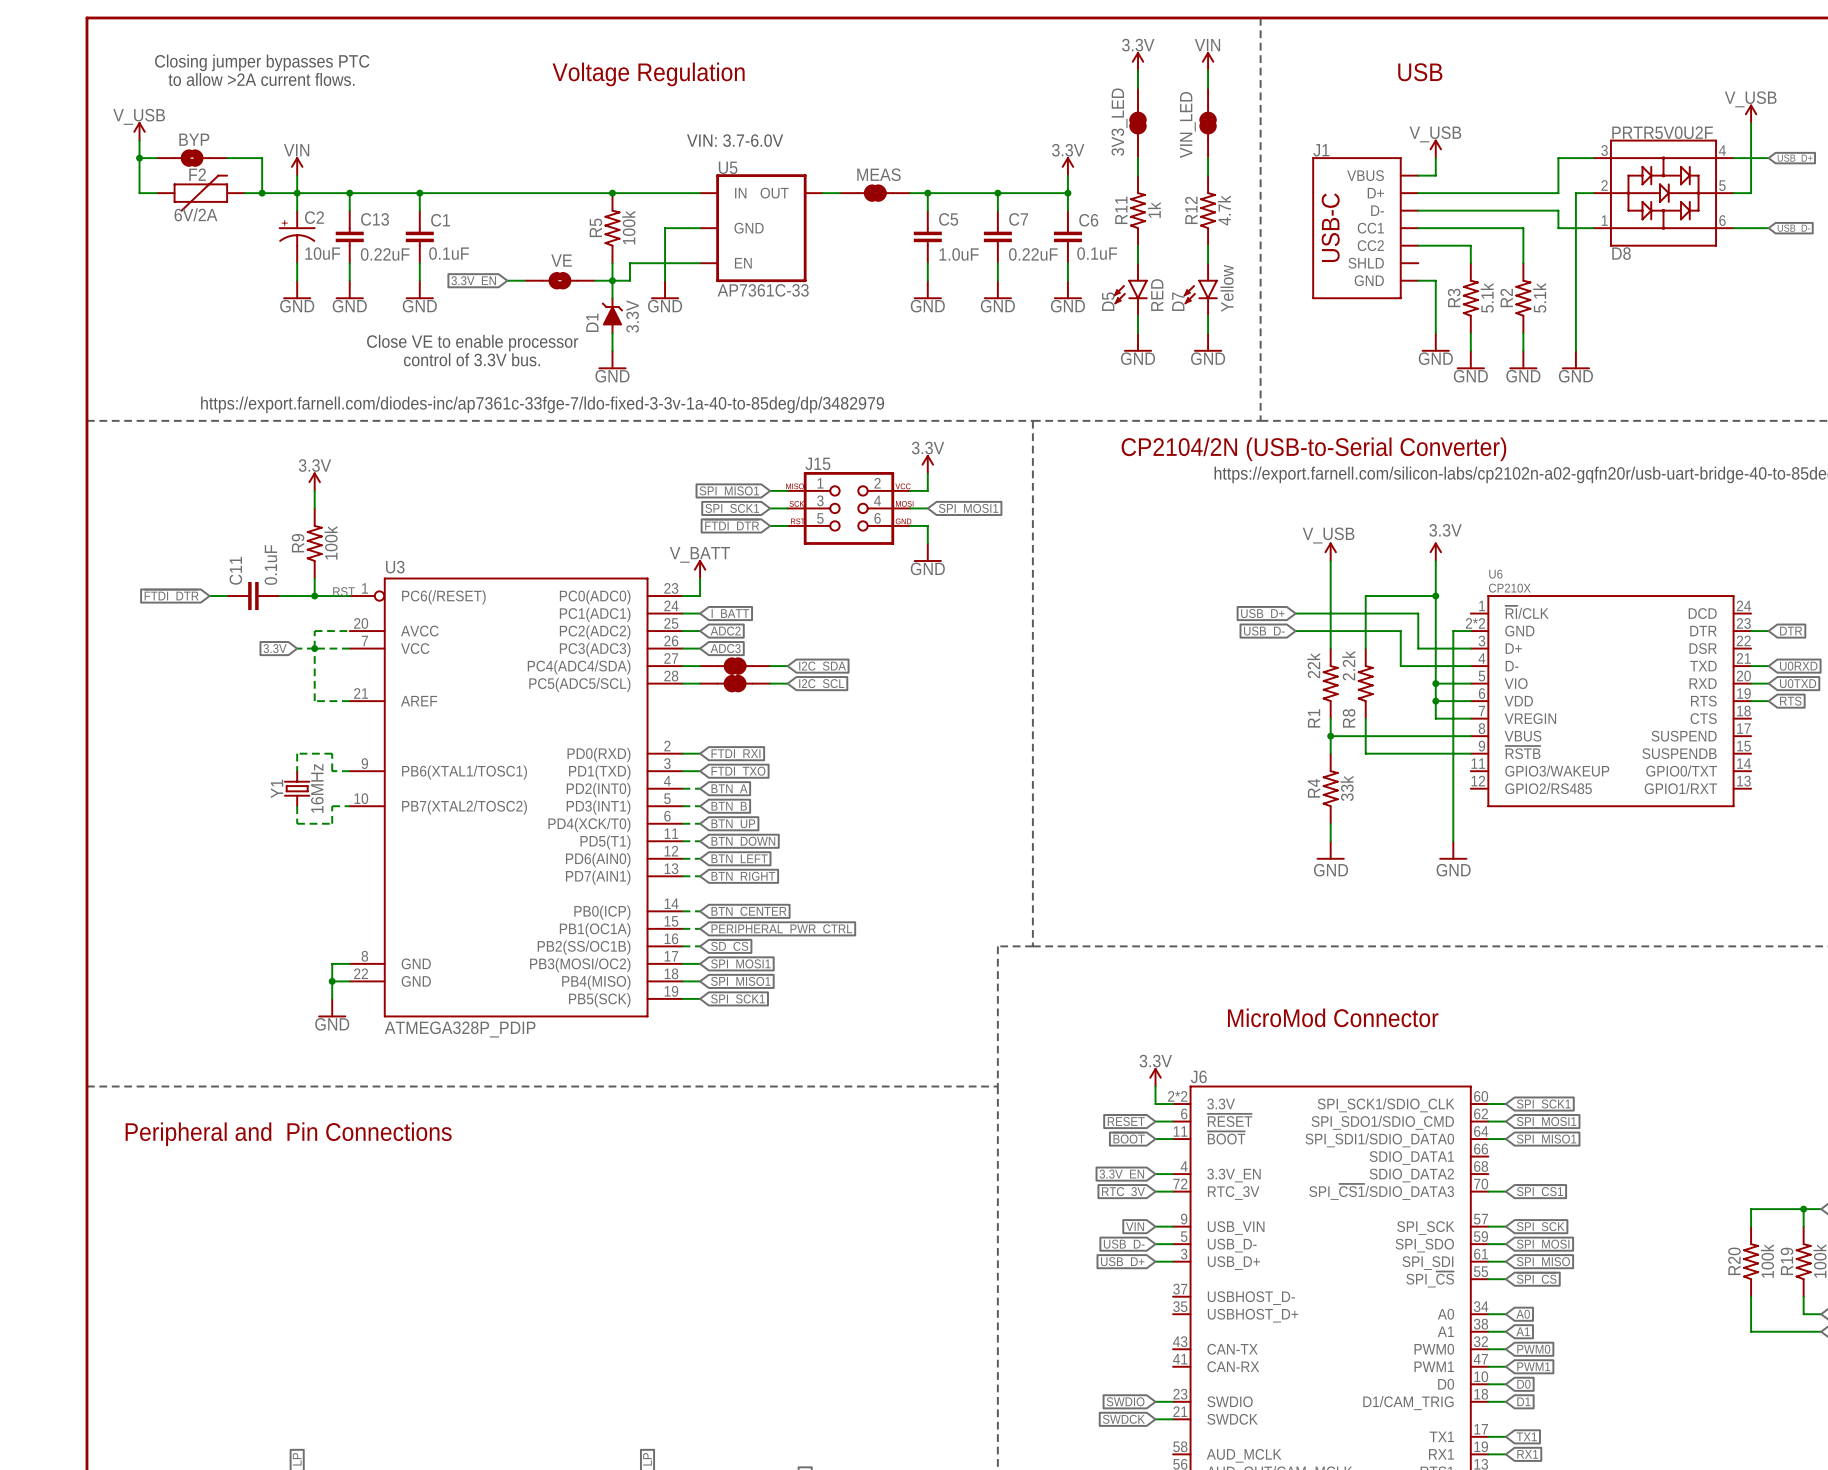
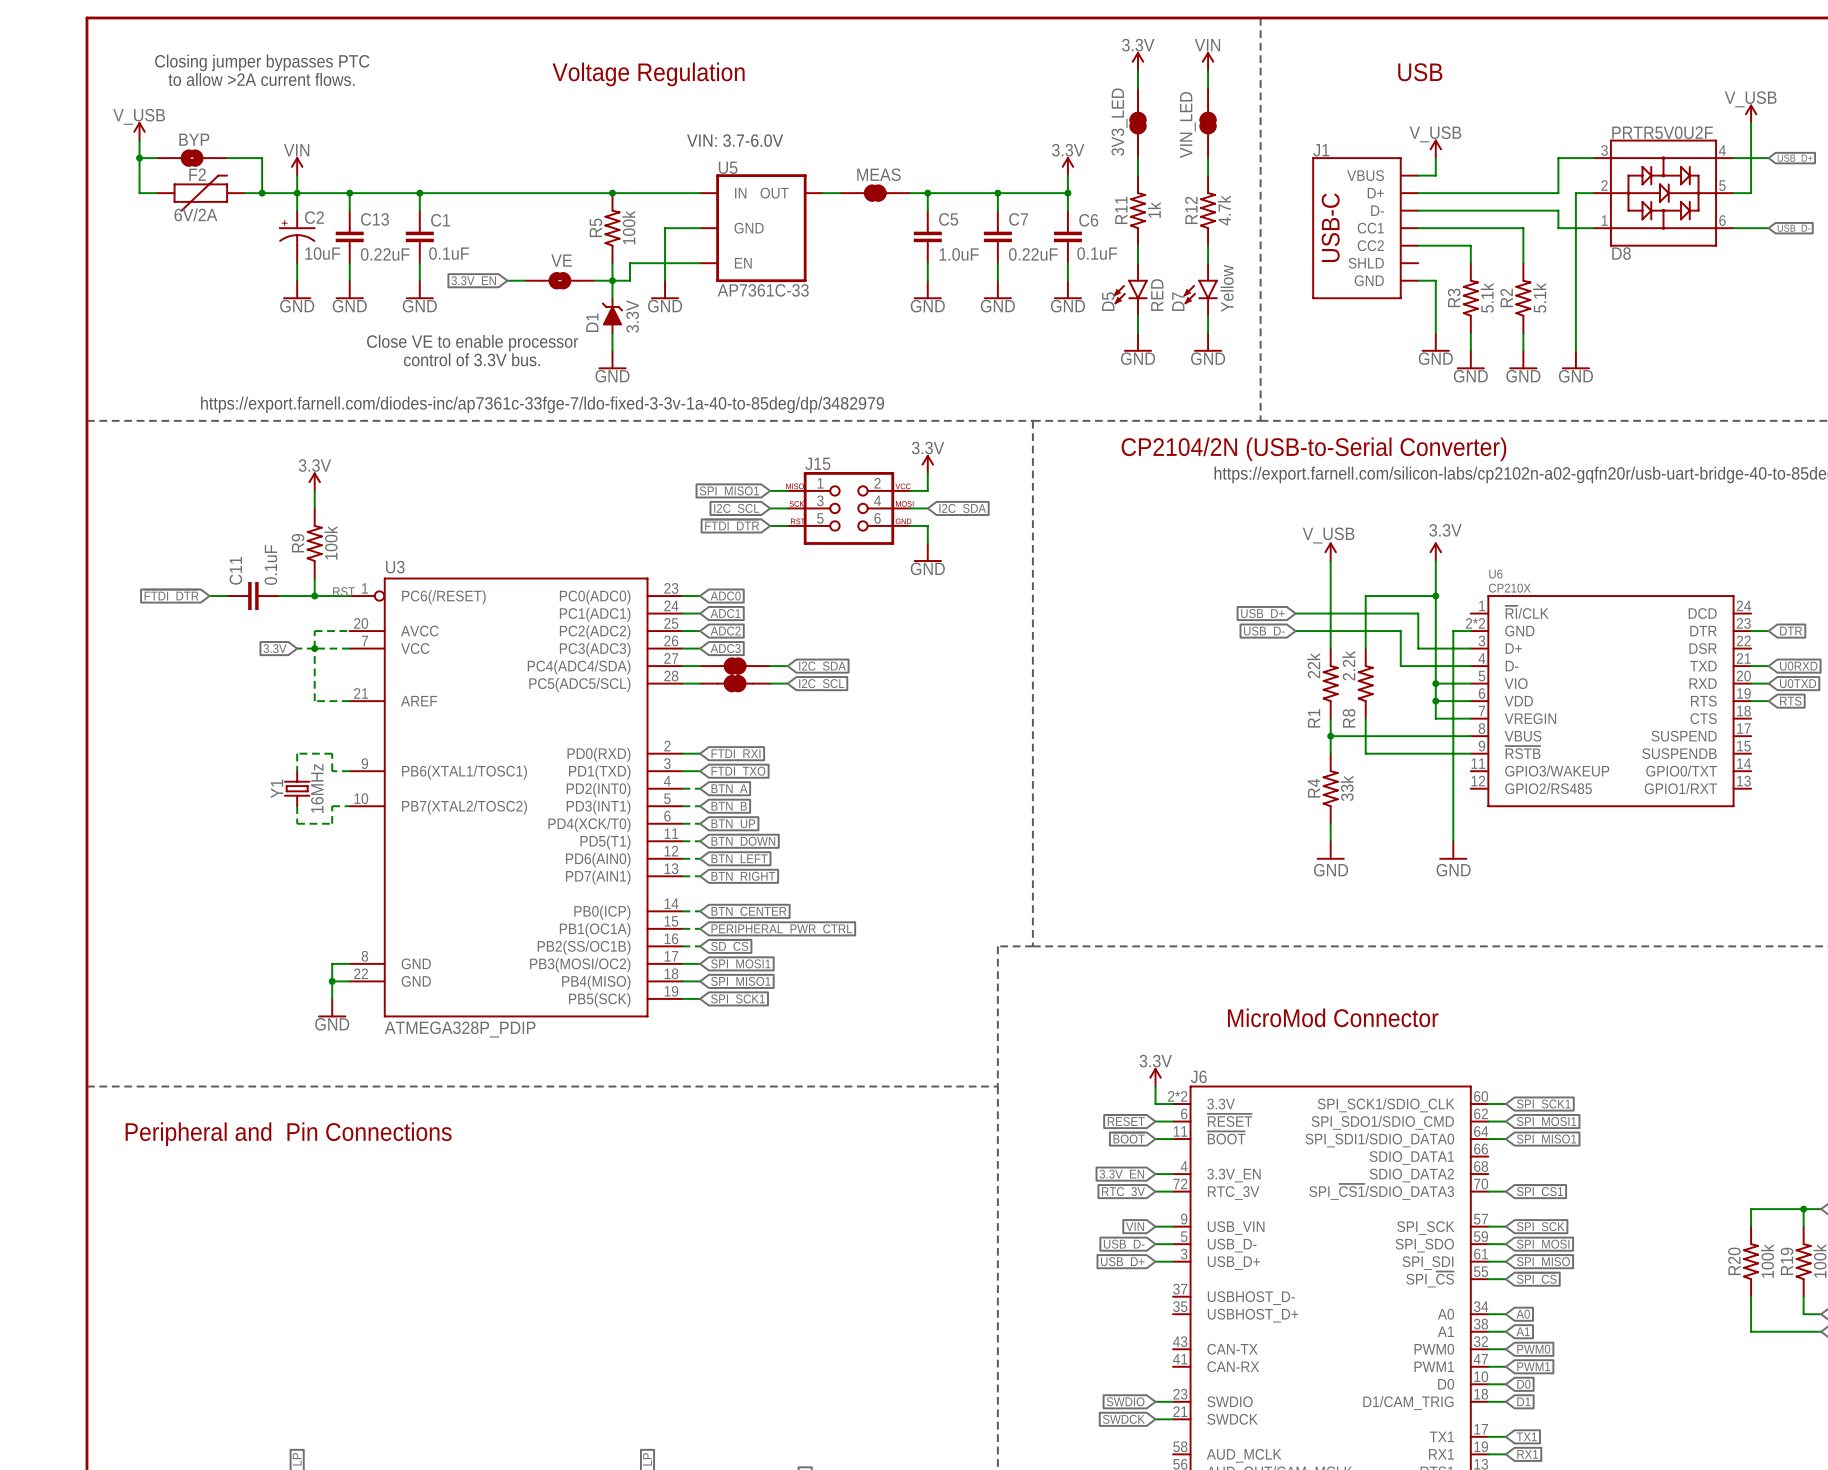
global label: SPI_SCK1 (732, 509) -> I2C_SCL (736, 509)
global label: SPI_MOSI1 (968, 509) -> I2C_SDA (962, 509)
power symbol: V_BATT (700, 569) -> none
wire: (700, 578) (700, 596) -> none
global label: none -> ADC0 (725, 596)
global label: I_BATT (730, 614) -> ADC1 (725, 613)

